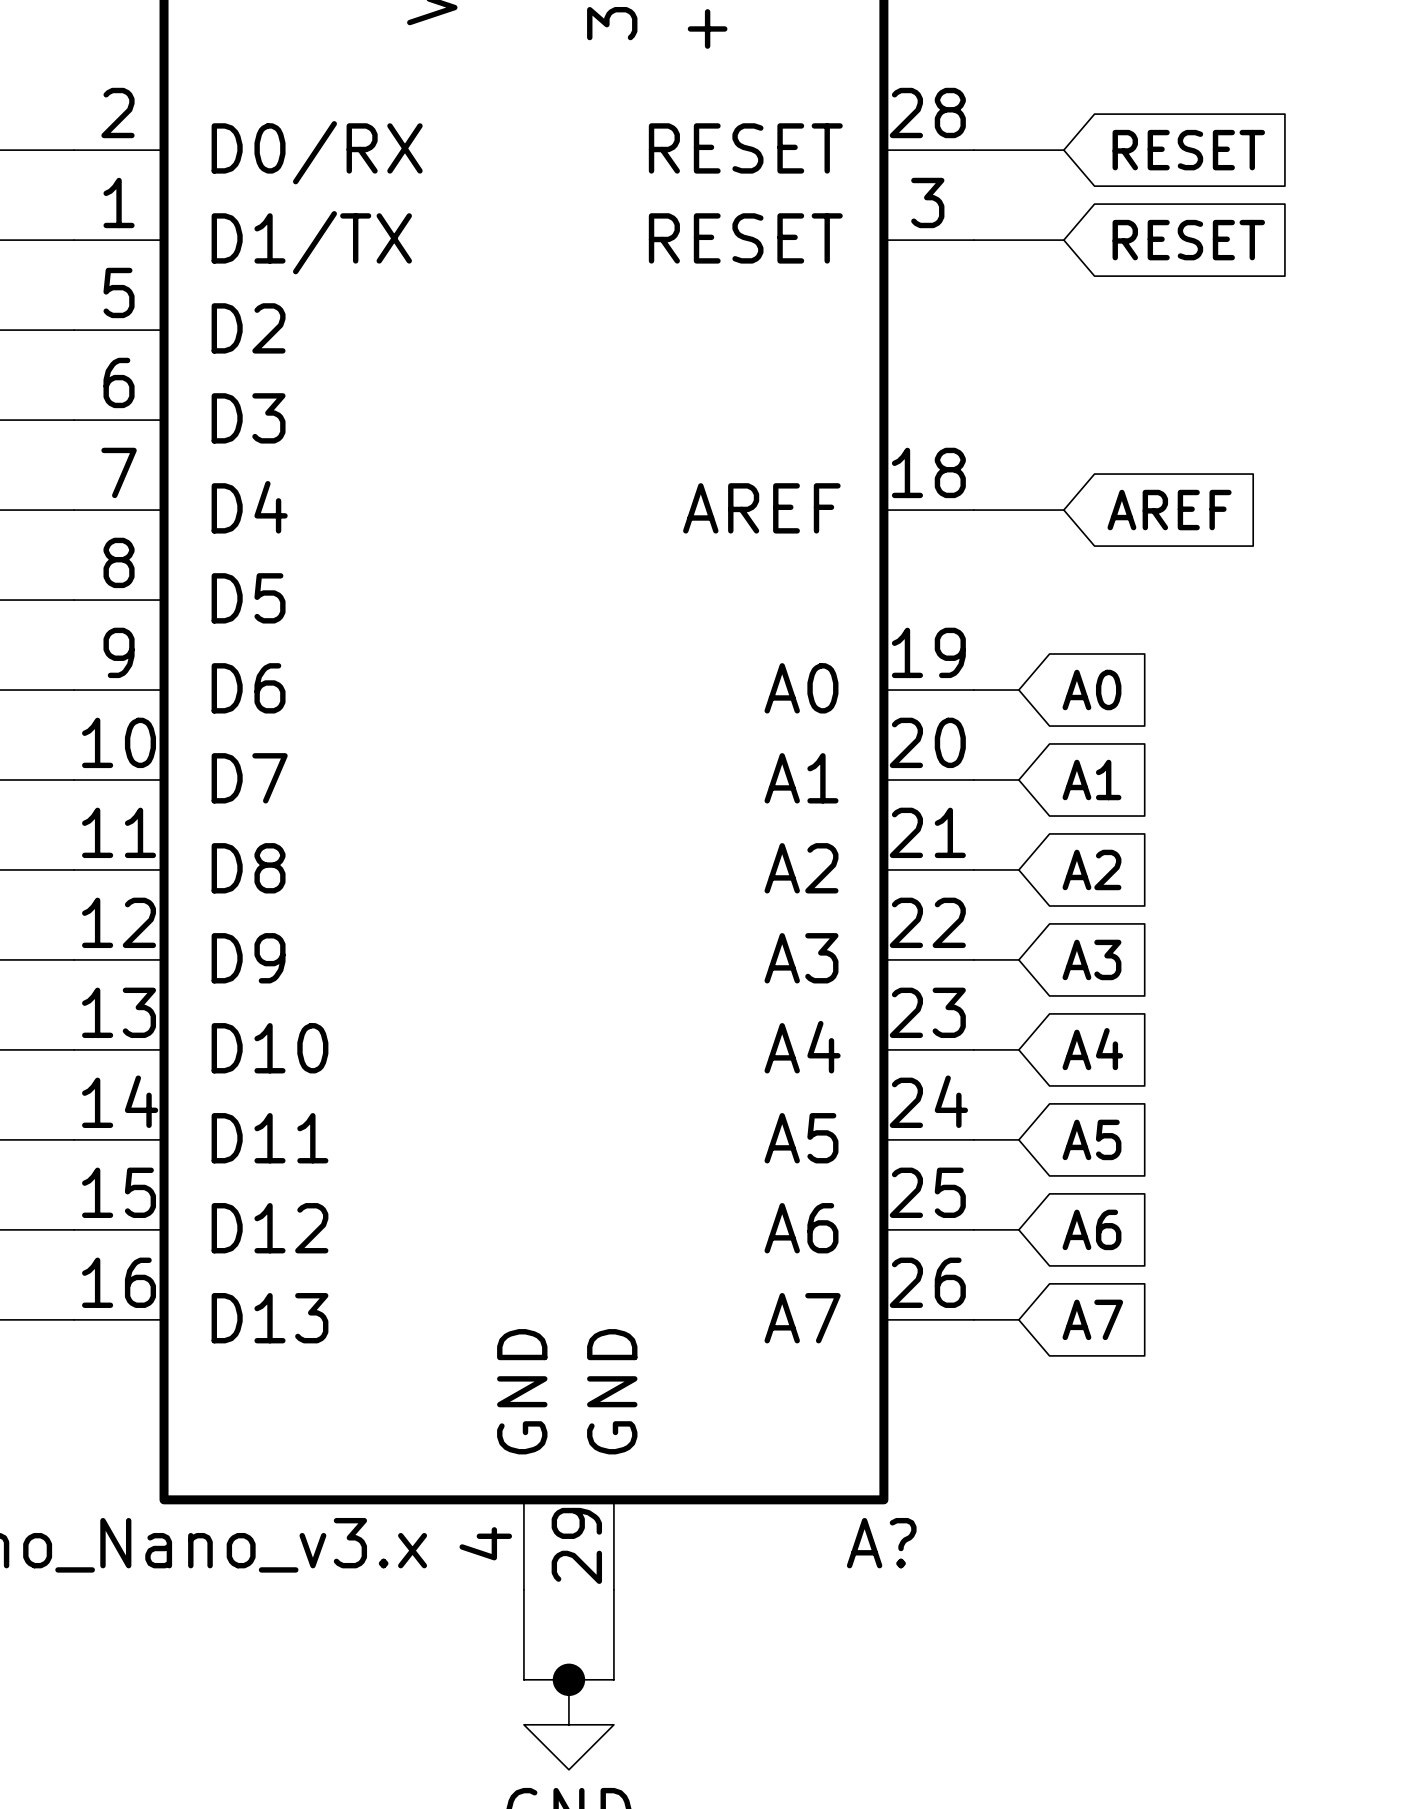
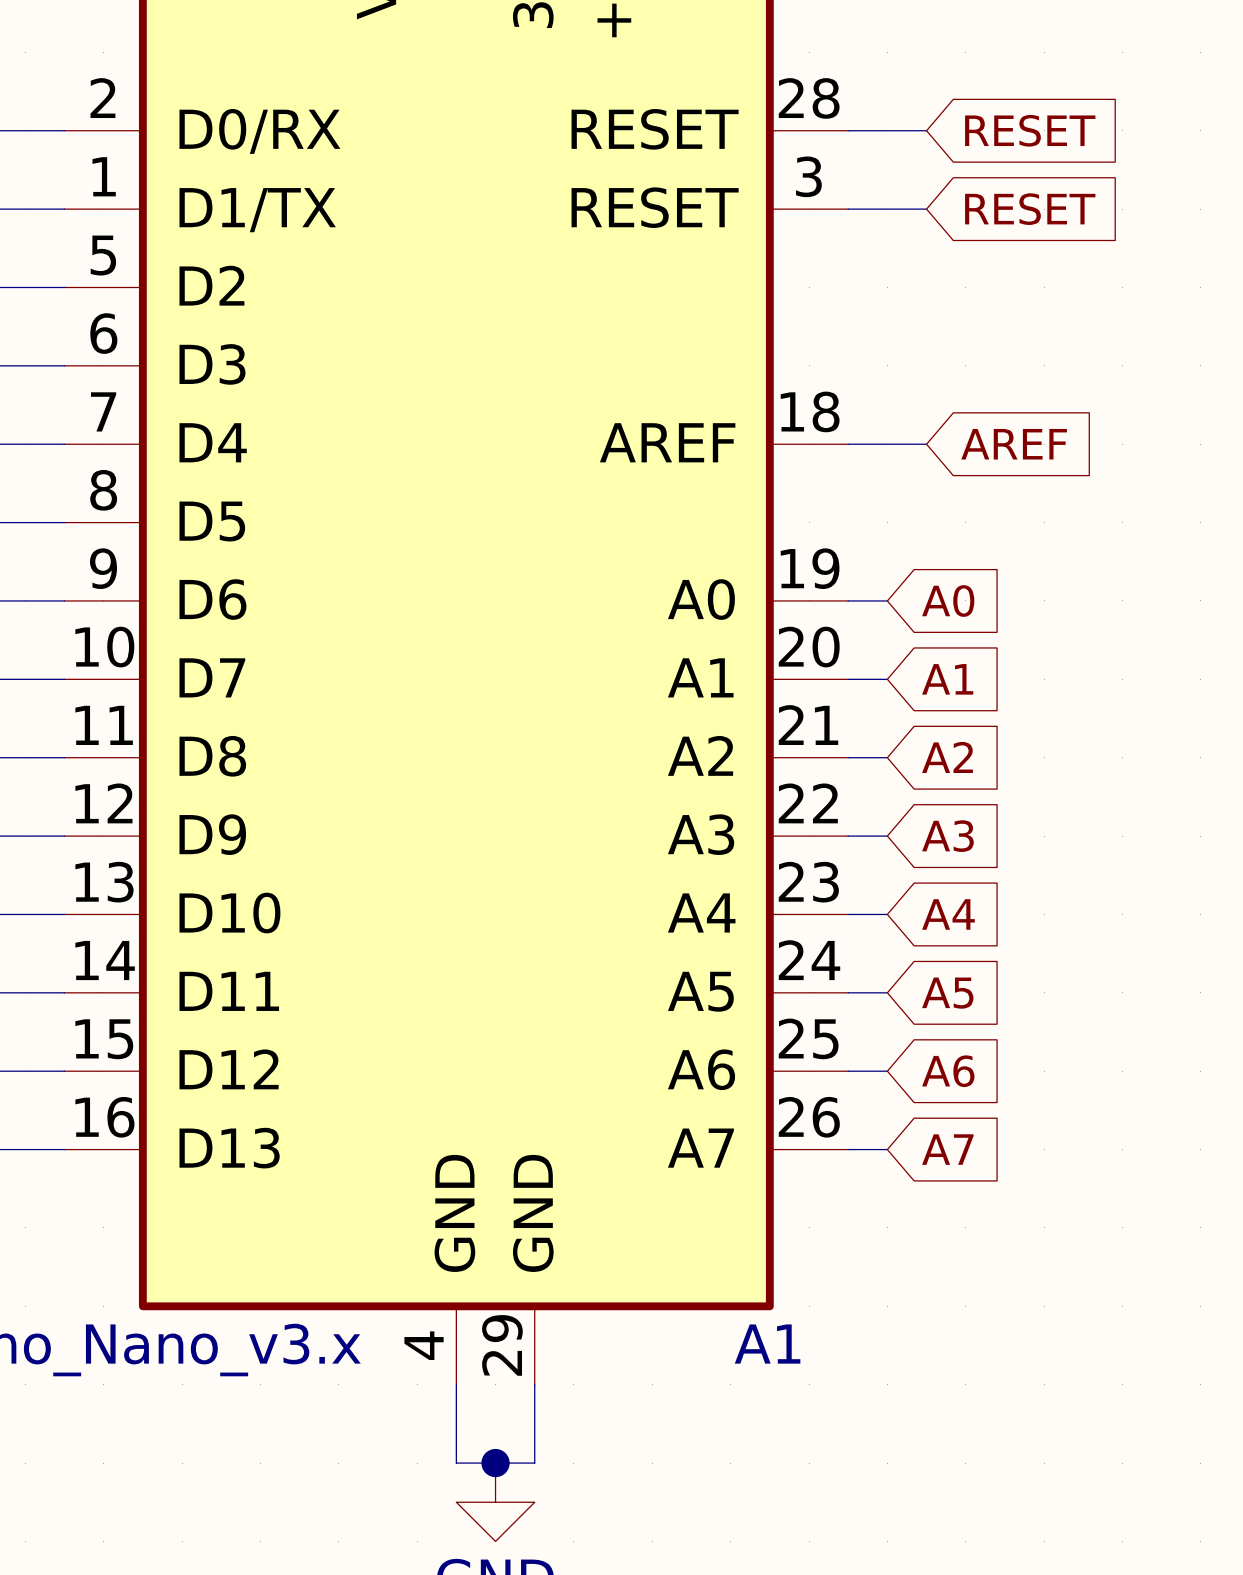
A? name: A? (881, 1543) -> A1 (767, 1344)

